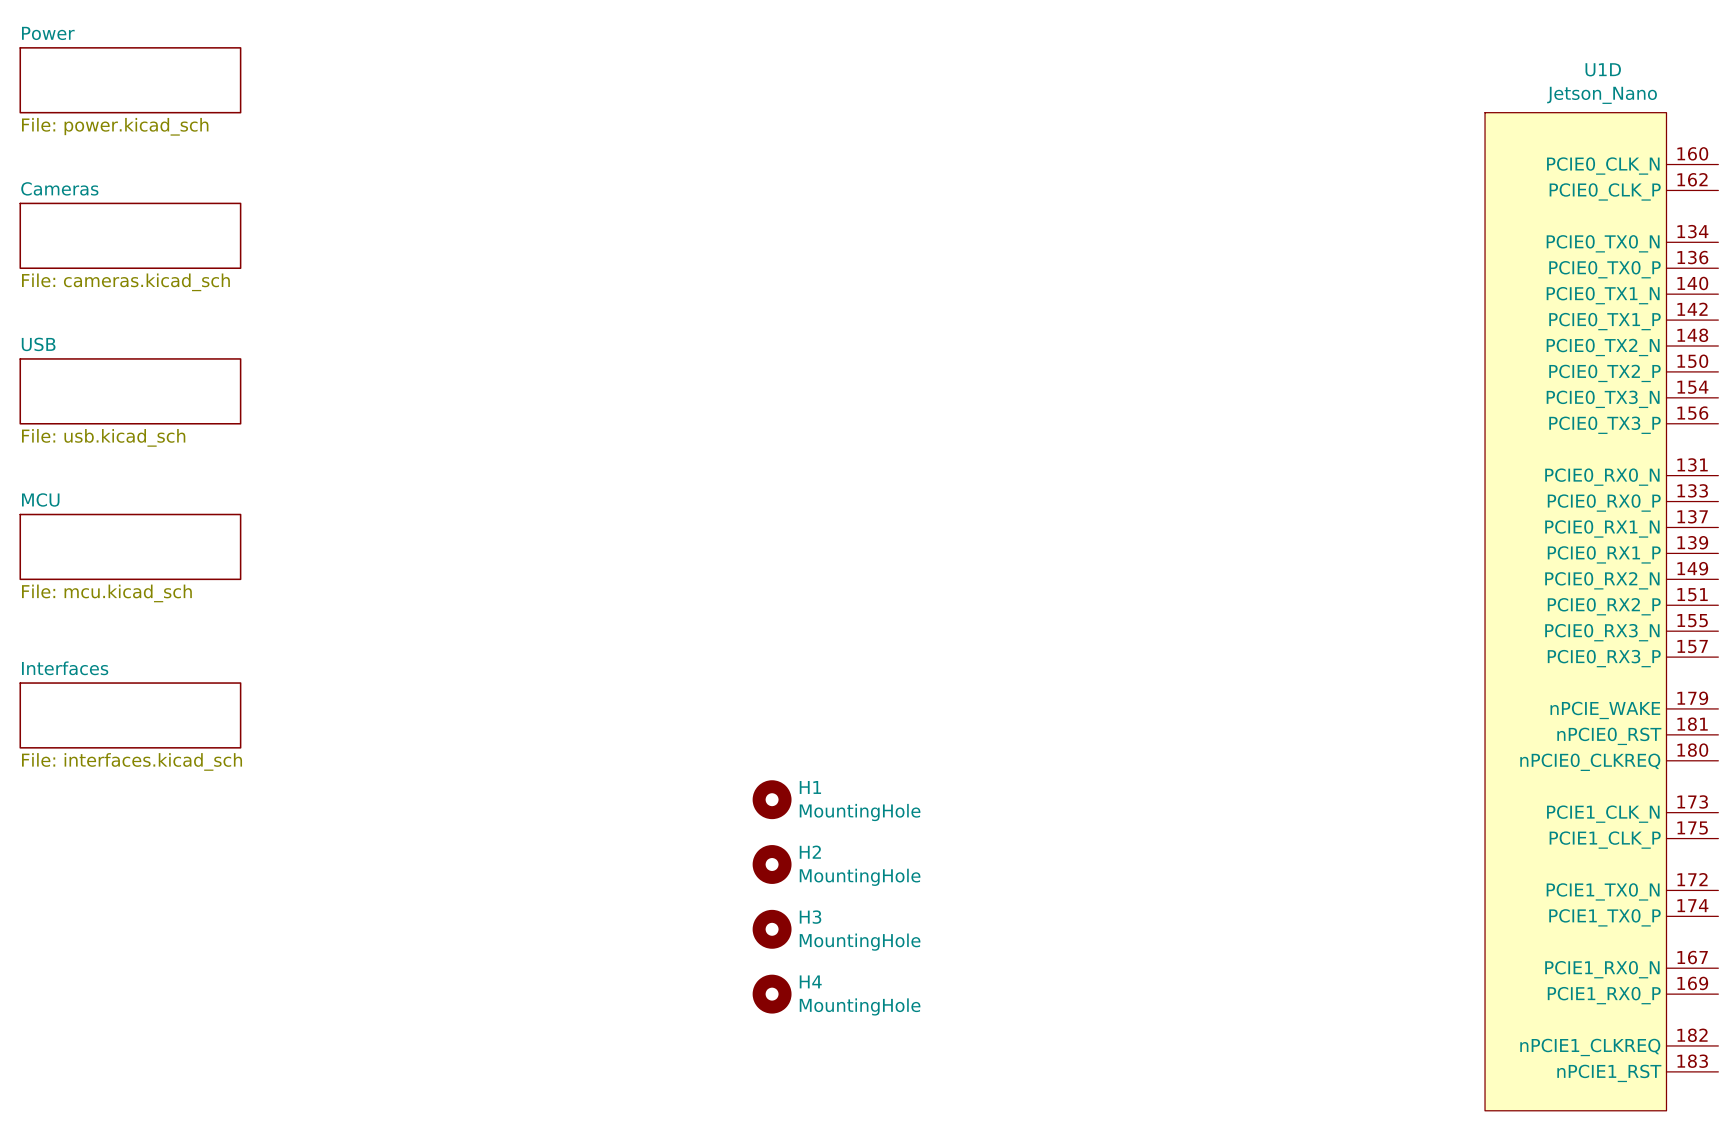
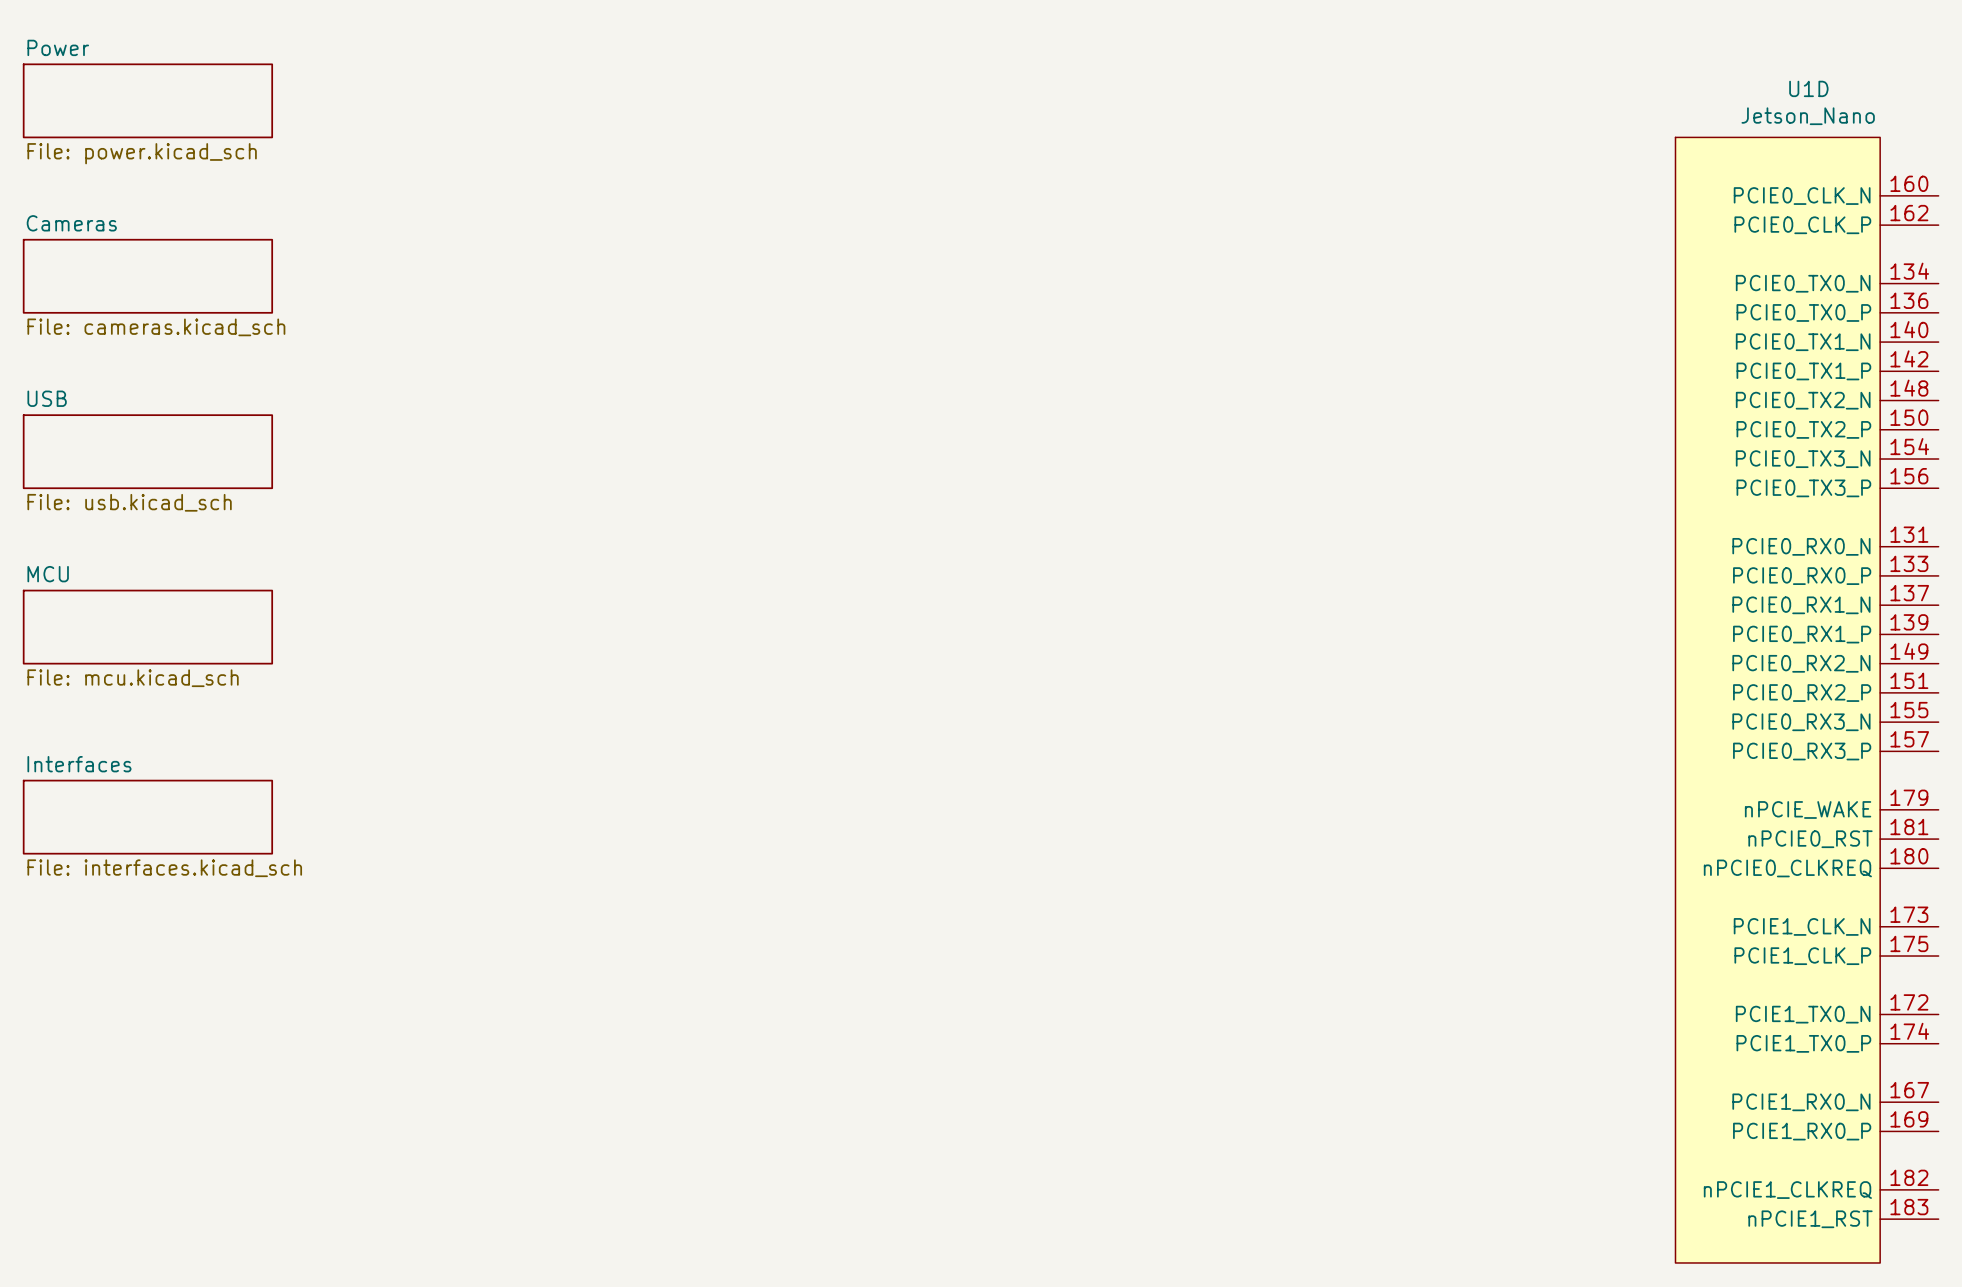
H1: MountingHole (772, 799) -> none
H2: MountingHole (772, 864) -> none
H3: MountingHole (772, 929) -> none
H4: MountingHole (772, 994) -> none

